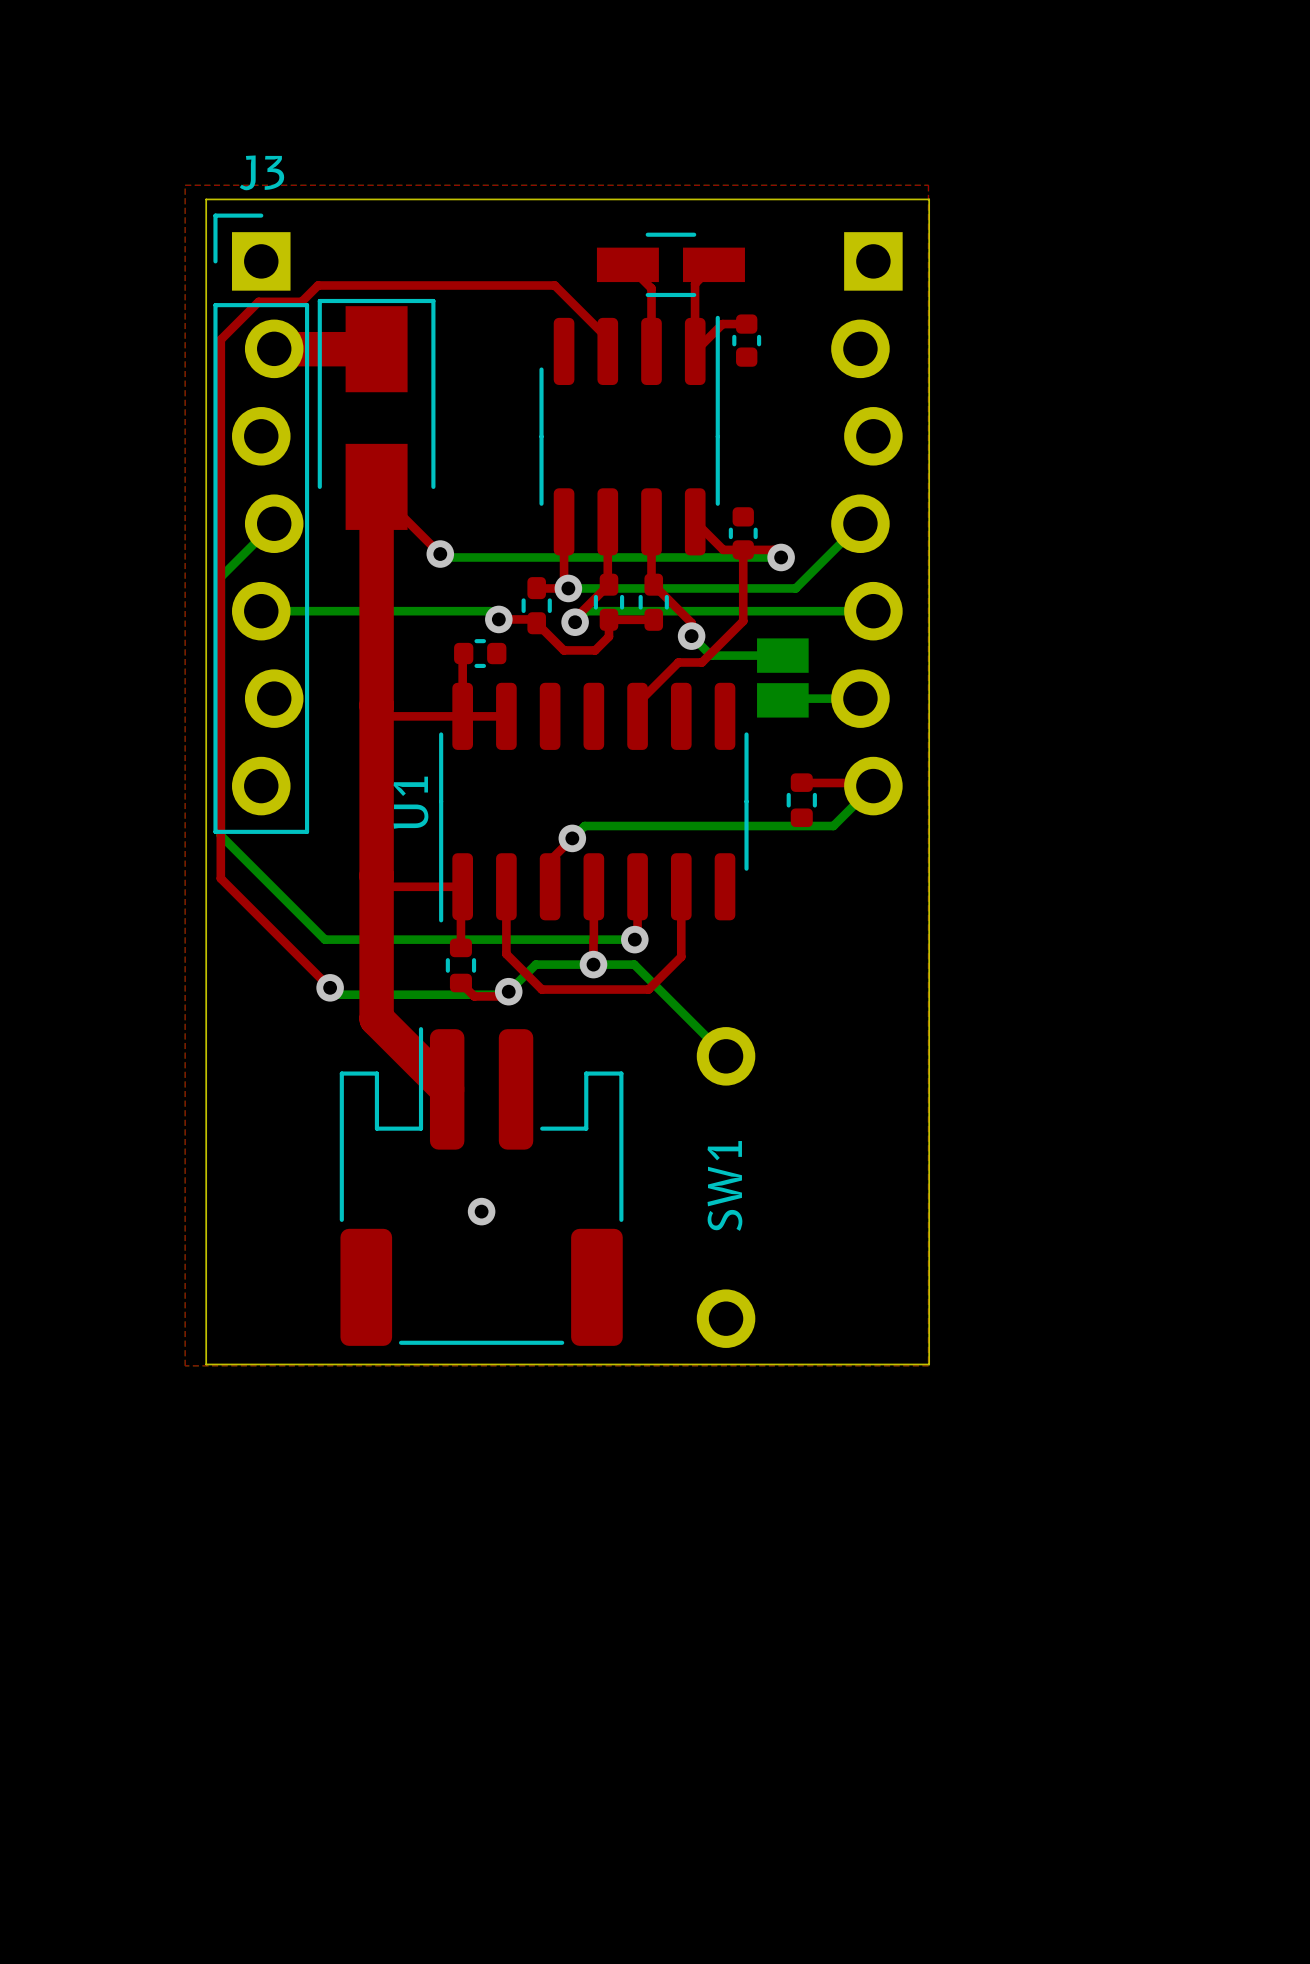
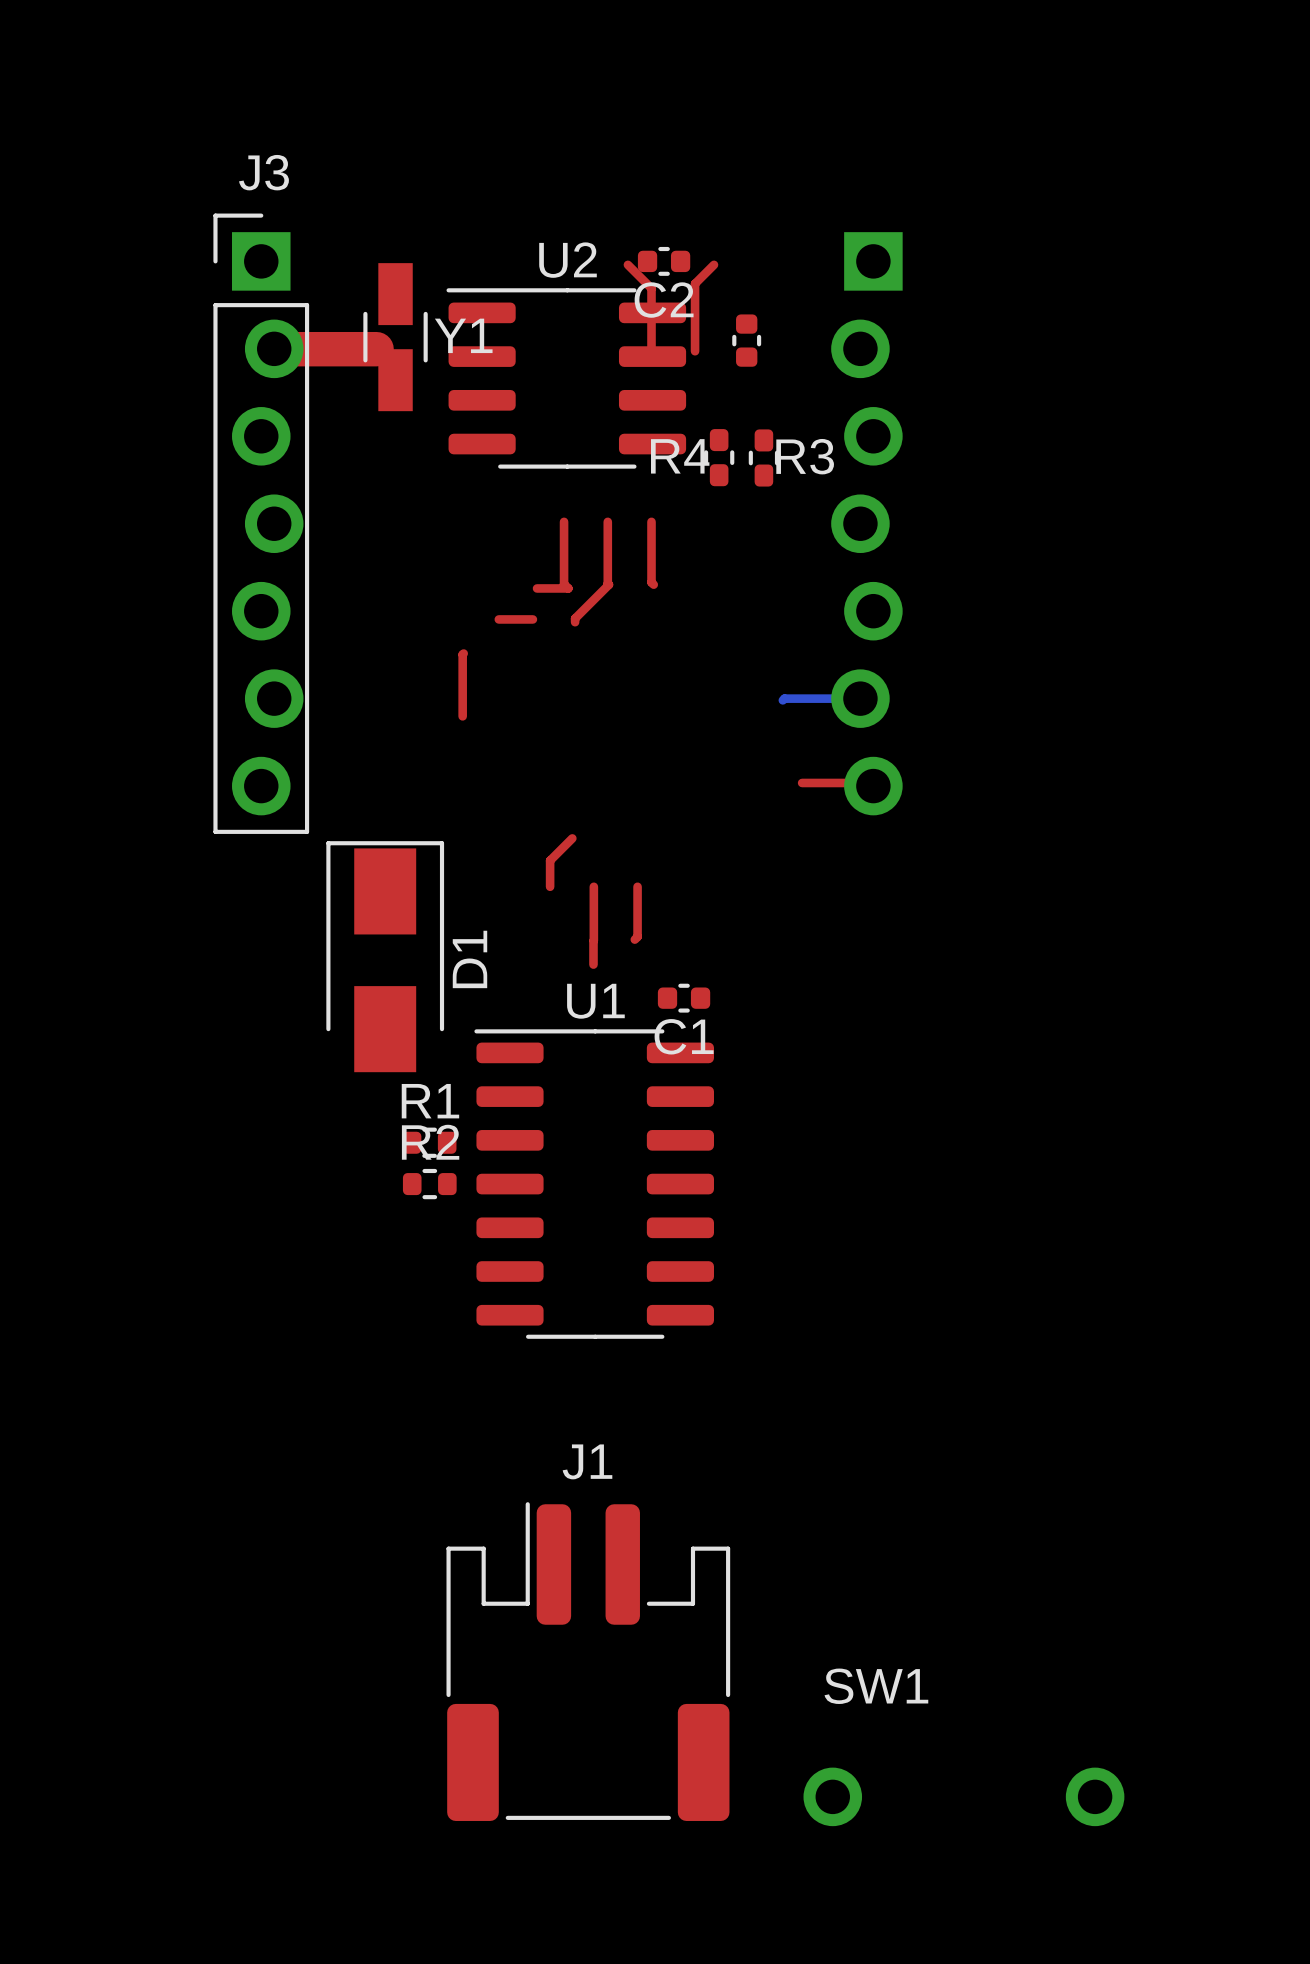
top zone outline: (185, 185) (185, 1365) (928, 1365) (928, 185) (185, 185) -> none
board edge: (206, 199) (929, 199) (929, 1364) (206, 1364) (206, 199) -> none
C2: none -> (664, 261)
part: (670, 264) -> none
top track: (746, 324) (722, 324) (695, 351) -> none
Y1: none -> (395, 337)
top track: (607, 351) (607, 338) (554, 285) (318, 285) (301, 301) (258, 301) (220, 339) (220, 878) (330, 987) -> none
U2: none -> (566, 378)
part: (376, 414) -> none
part: (629, 435) -> none
R4: none -> (719, 457)
R3: none -> (763, 457)
top track: (695, 521) (723, 549) (773, 549) (781, 557) -> none
bottom track: (274, 523) (220, 577) (220, 835) (324, 939) (634, 939) -> none
bottom track: (860, 523) (795, 588) (568, 588) -> none
part: (743, 533) -> none
top track: (743, 549) (743, 621) (701, 662) (678, 662) (637, 703) (637, 716) -> none
top track: (440, 554) (376, 490) (376, 486) (376, 1018) (447, 1089) -> none
bottom track: (440, 554) (443, 557) (781, 557) -> none
via: (440, 554) -> none
via: (781, 557) -> none
top track: (653, 585) (691, 622) (691, 636) -> none
via: (568, 588) -> none
part: (608, 602) -> none
part: (653, 602) -> none
part: (536, 605) -> none
bottom track: (261, 611) (490, 611) (498, 619) -> none
bottom track: (873, 611) (586, 611) (575, 622) -> none
via: (498, 619) -> none
top track: (653, 619) (608, 619) (608, 636) (595, 650) (563, 650) (536, 623) -> none
via: (575, 622) -> none
bottom track: (691, 636) (711, 655) (784, 655) -> none
via: (691, 636) -> none
part: (480, 653) -> none
part: (782, 677) -> none
top track: (376, 705) (387, 716) (506, 716) -> none
bottom track: (873, 786) (833, 826) (584, 826) (572, 838) -> none
part: (801, 800) -> none
U1 rotation: 0° (593, 802) -> 90° clockwise (594, 1184)
U1 position: (593, 802) -> (594, 1184)
via: (572, 838) -> none
top track: (376, 875) (387, 886) (462, 886) (460, 888) (460, 947) -> none
top track: (506, 886) (506, 954) (541, 989) (648, 989) (681, 956) (681, 886) -> none
via: (634, 939) -> none
D1: none -> (385, 956)
via: (593, 964) -> none
part: (460, 965) -> none
top track: (460, 983) (474, 996) (503, 996) (508, 991) -> none
bottom track: (330, 987) (337, 994) (505, 994) (535, 964) (634, 964) (726, 1056) -> none
via: (330, 987) -> none
via: (508, 991) -> none
C1: none -> (684, 998)
R1: none -> (429, 1142)
R2: none -> (429, 1184)
SW1 name position: SW1 (724, 1185) -> SW1 (876, 1686)
part: (481, 1186) -> none
SW1 rotation: 0° (726, 1187) -> 90° clockwise (963, 1796)
SW1 position: (726, 1187) -> (963, 1796)
via: (481, 1211) -> none
J1: none -> (588, 1661)

